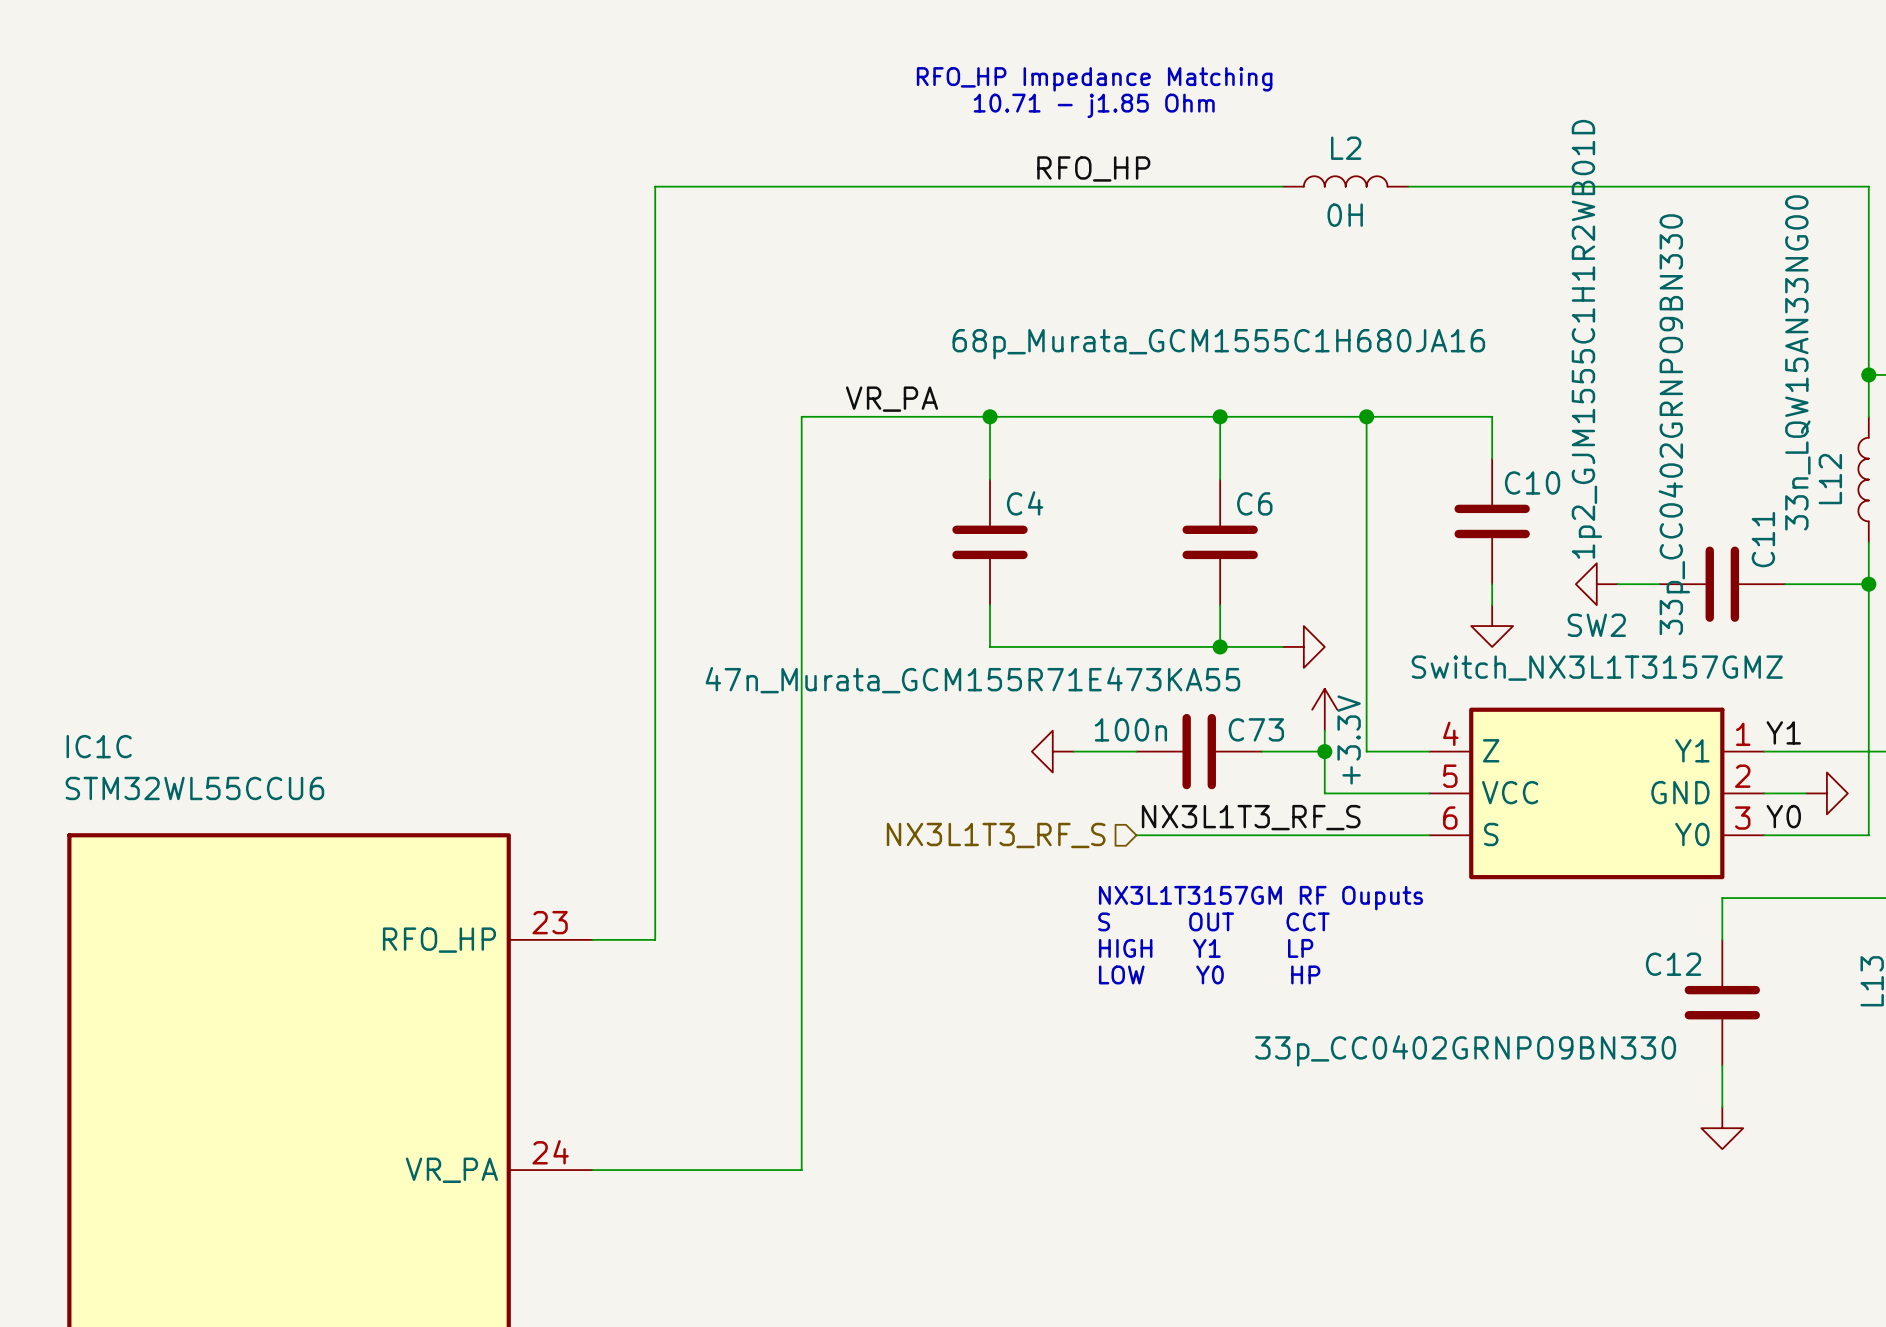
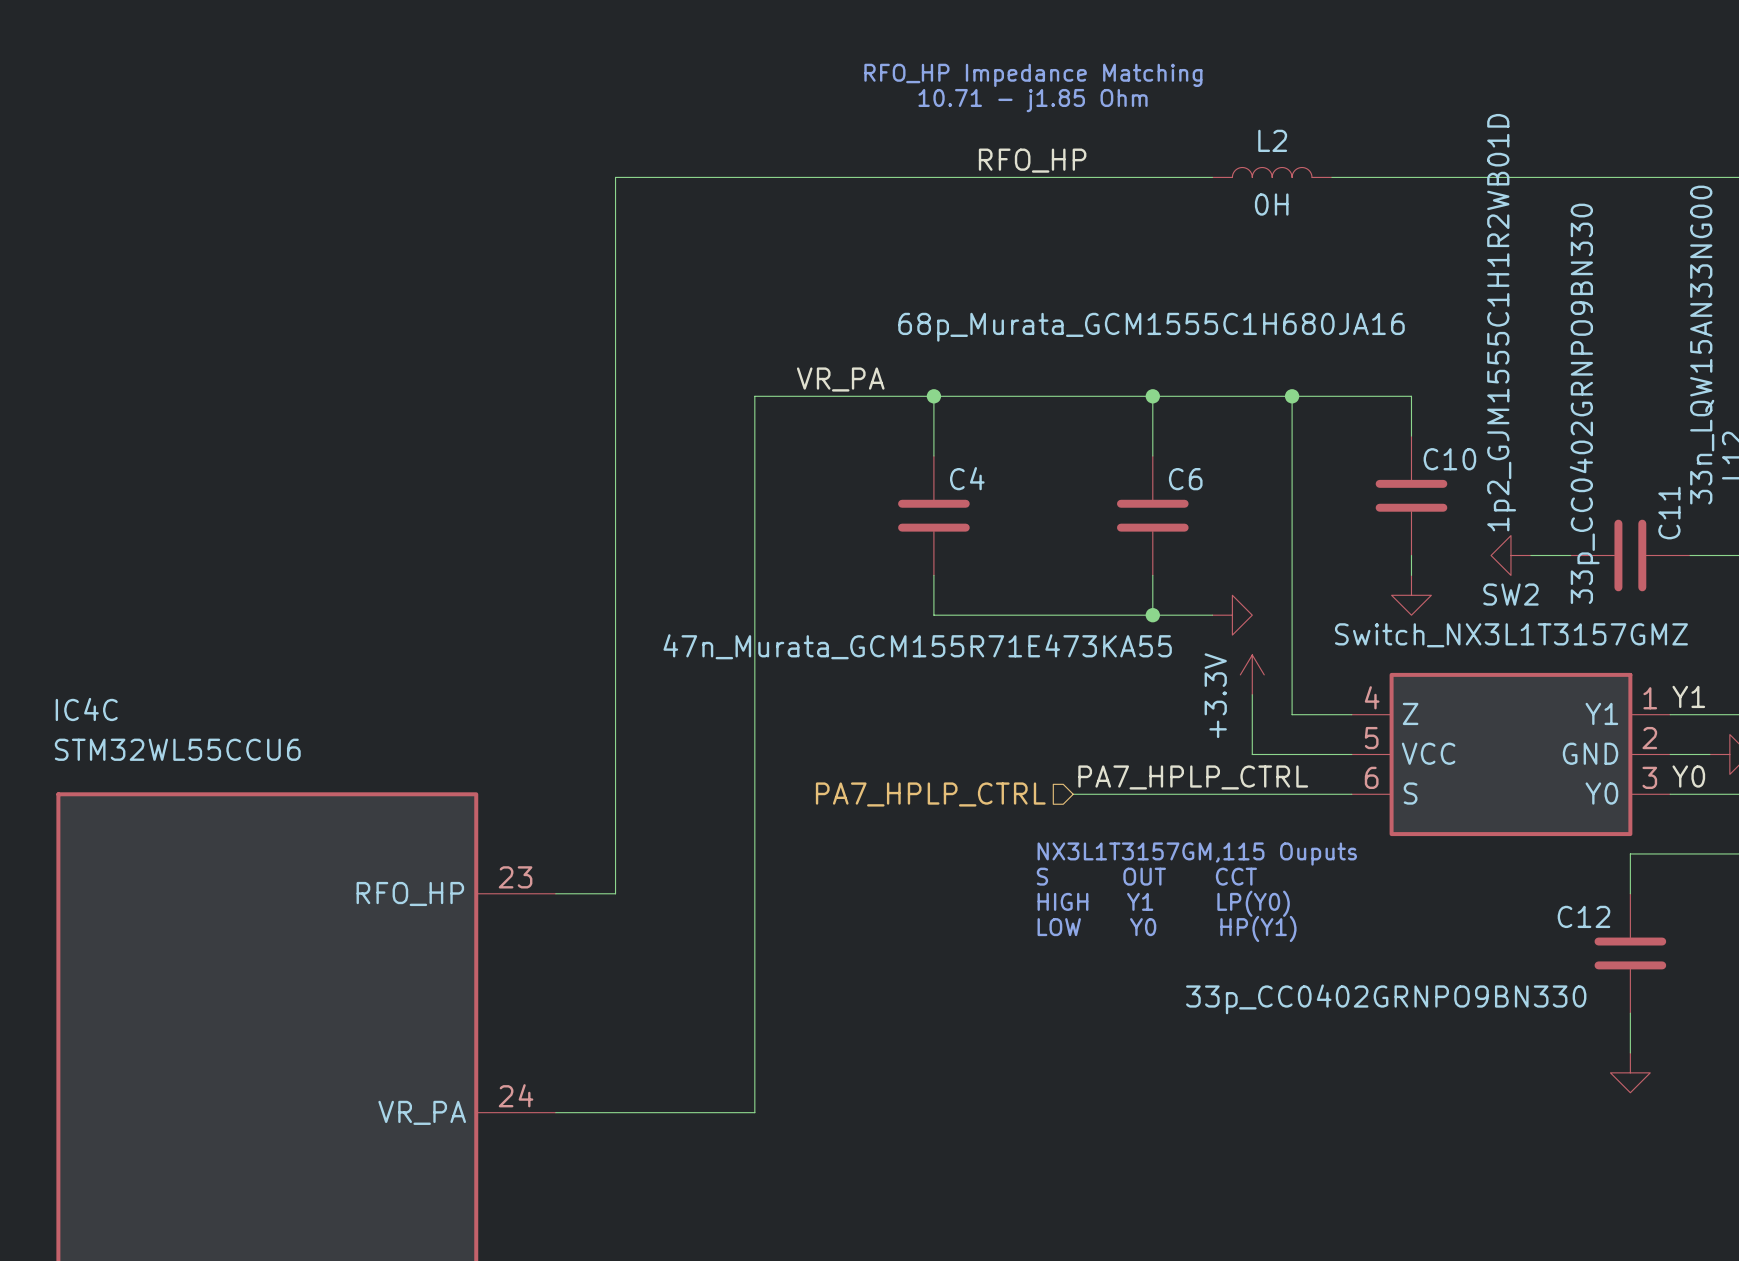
power symbol text position: +3.3V (1349, 739) -> +3.3V (1215, 695)
IC1C name: IC1C (99, 746) -> IC4C (86, 709)
power symbol: (1052, 751) -> none
wire: (1073, 751) (1136, 751) -> none
C73: 100n (1199, 751) -> none
wire: (1262, 751) (1324, 751) -> none
junction: (1324, 751) -> none
label: NX3L1T3_RF_S (1251, 817) -> PA7_HPLP_CTRL (1193, 777)
hierarchical label: NX3L1T3_RF_S (996, 835) -> PA7_HPLP_CTRL (930, 794)
text: NX3L1T3157GM RF Ouputs (1261, 898) -> NX3L1T3157GM,115 Ouputs (1197, 854)
text: HIGH Y1 LP (1206, 948) -> HIGH Y1 LP(Y0) (1163, 903)
text: LOW Y0 HP (1209, 974) -> LOW Y0 HP(Y1) (1167, 928)

